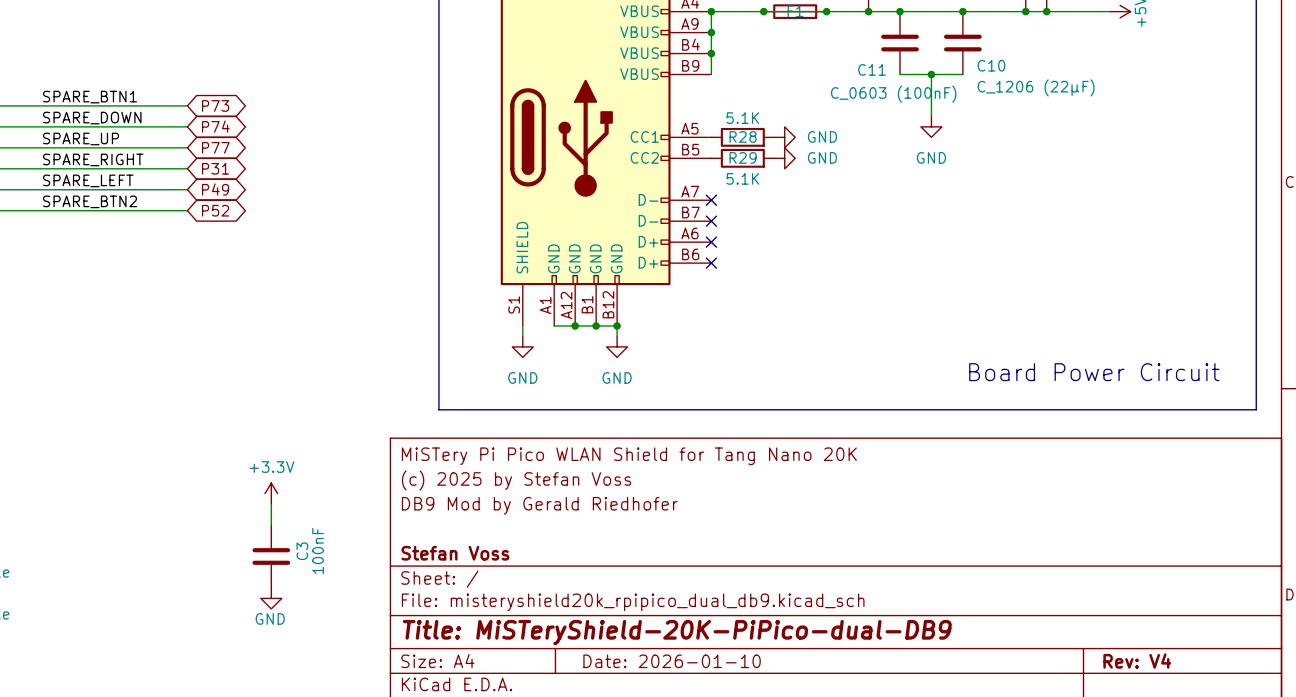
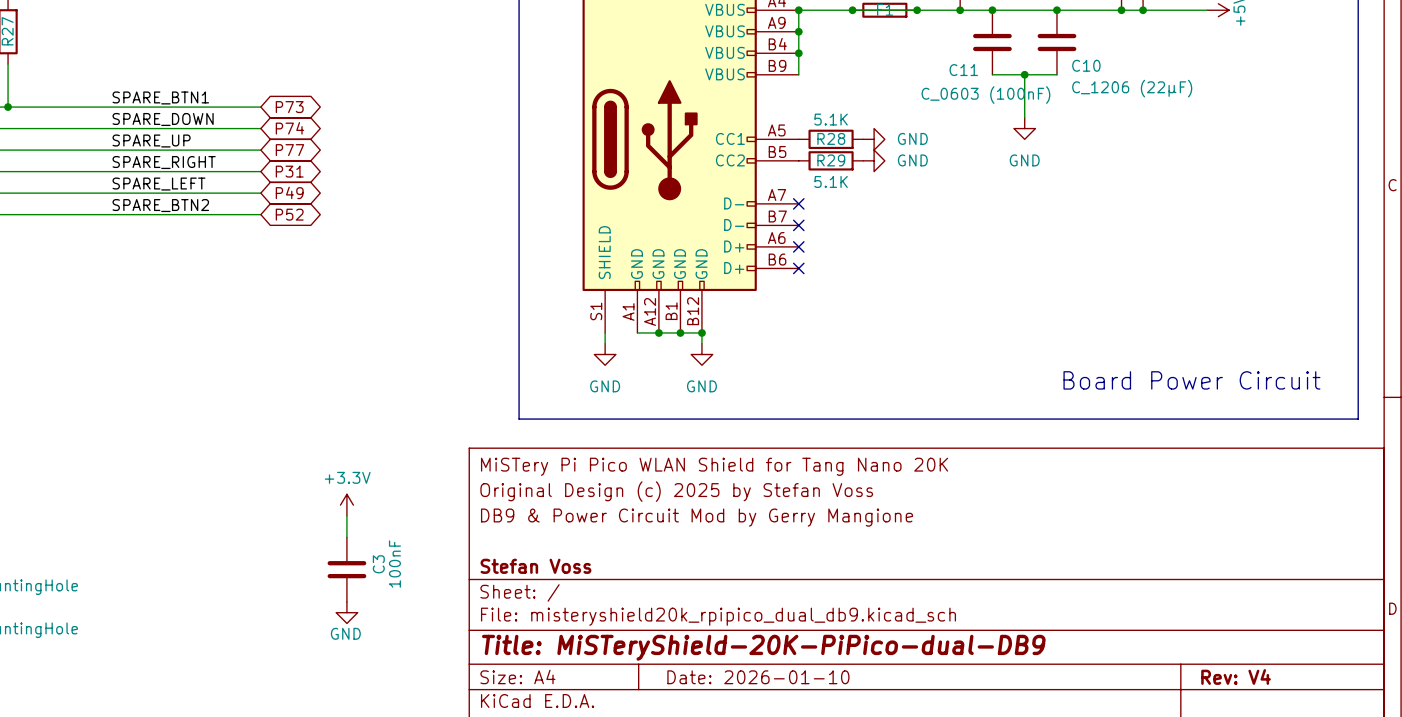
title block: (c) 2025 by Stefan Voss (516, 480) -> Original Design (c) 2025 by Stefan Voss (676, 491)
title block: DB9 Mod by Gerald Riedhofer (539, 505) -> DB9 & Power Circuit Mod by Gerry Mangione (697, 517)

